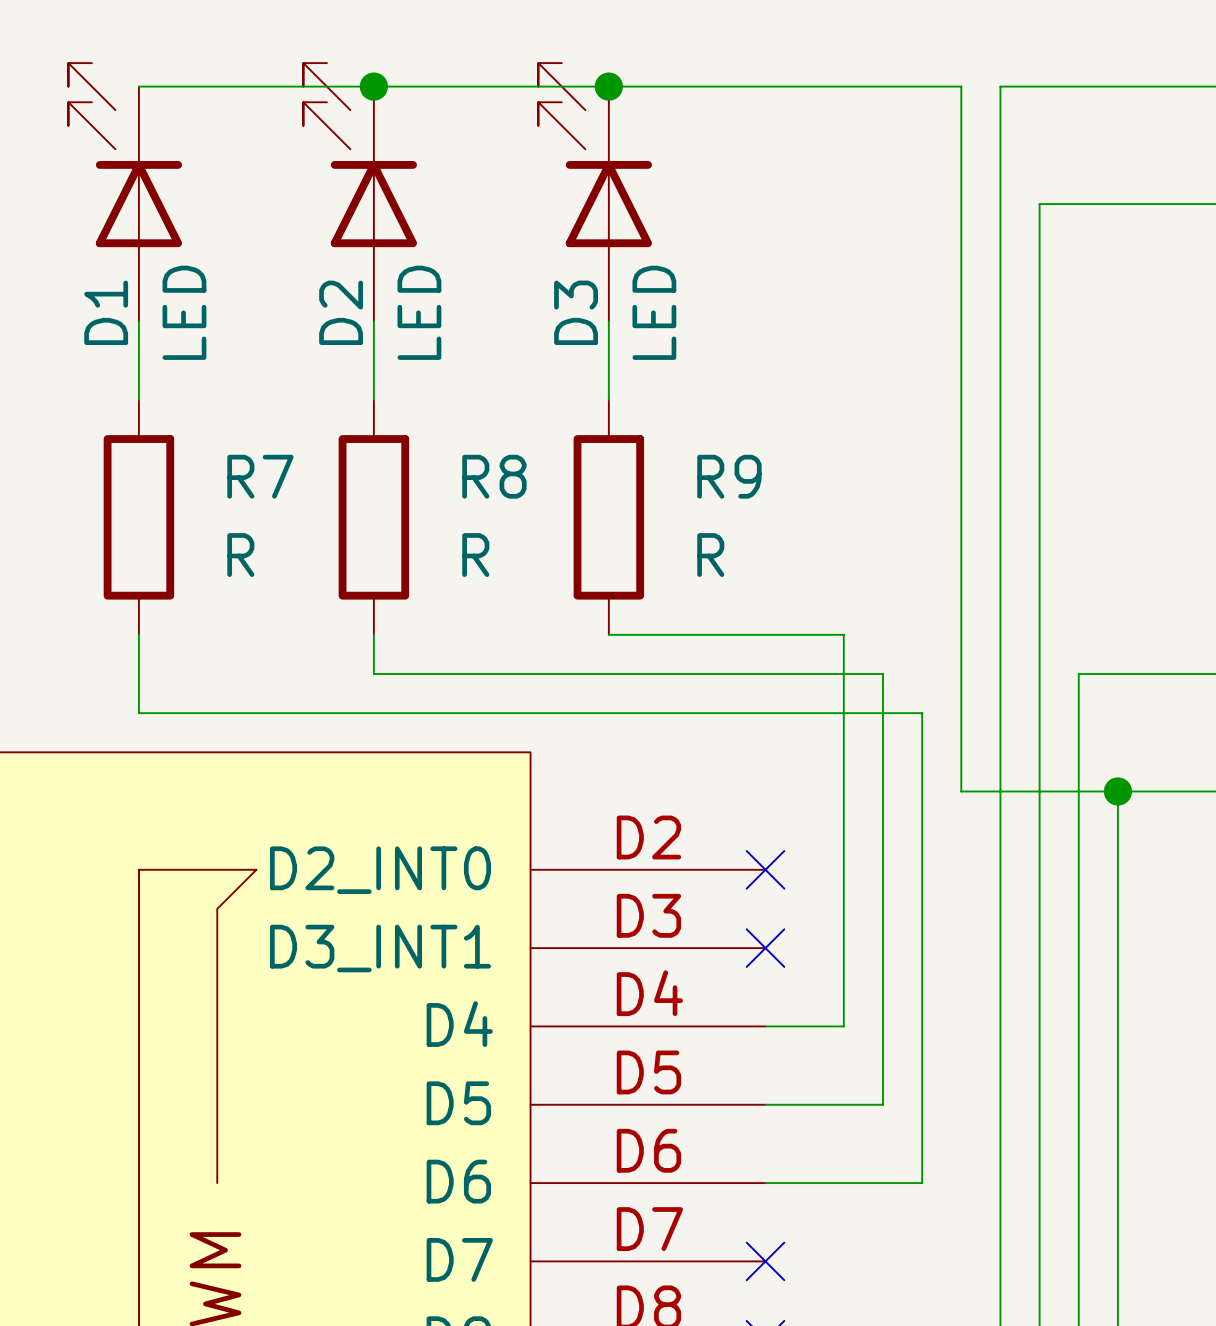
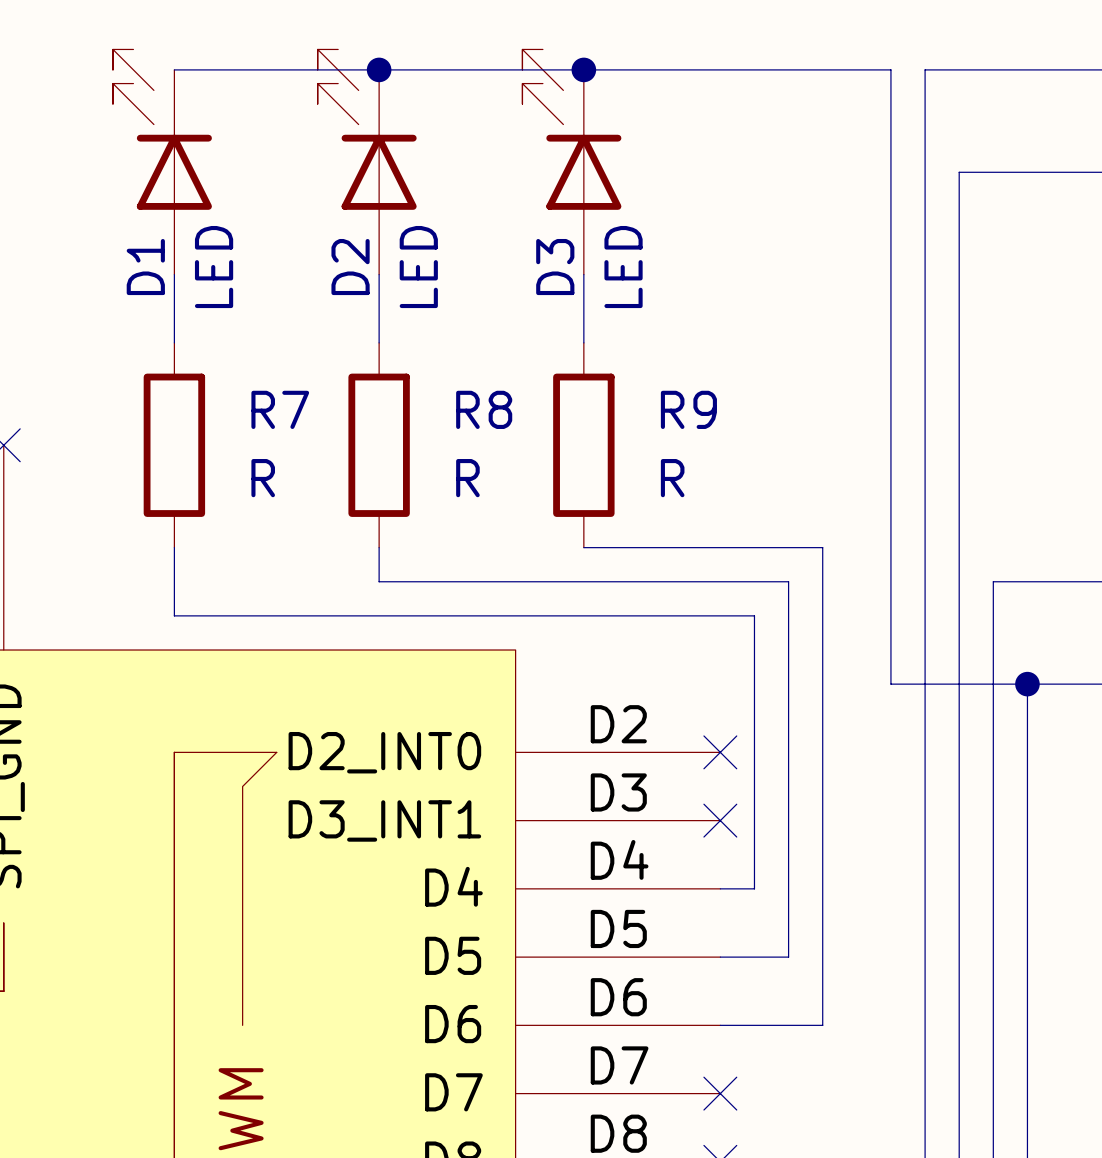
wire: (843, 634) (843, 673) (882, 673) -> (788, 547) (822, 547) (822, 581)
wire: (804, 713) (922, 713) (922, 1183) (882, 1183) -> (754, 615) (754, 888)
wire: (804, 1026) (843, 1026) -> (788, 957) (788, 888)
wire: (843, 1104) (882, 1104) -> (822, 1025) (822, 957)

